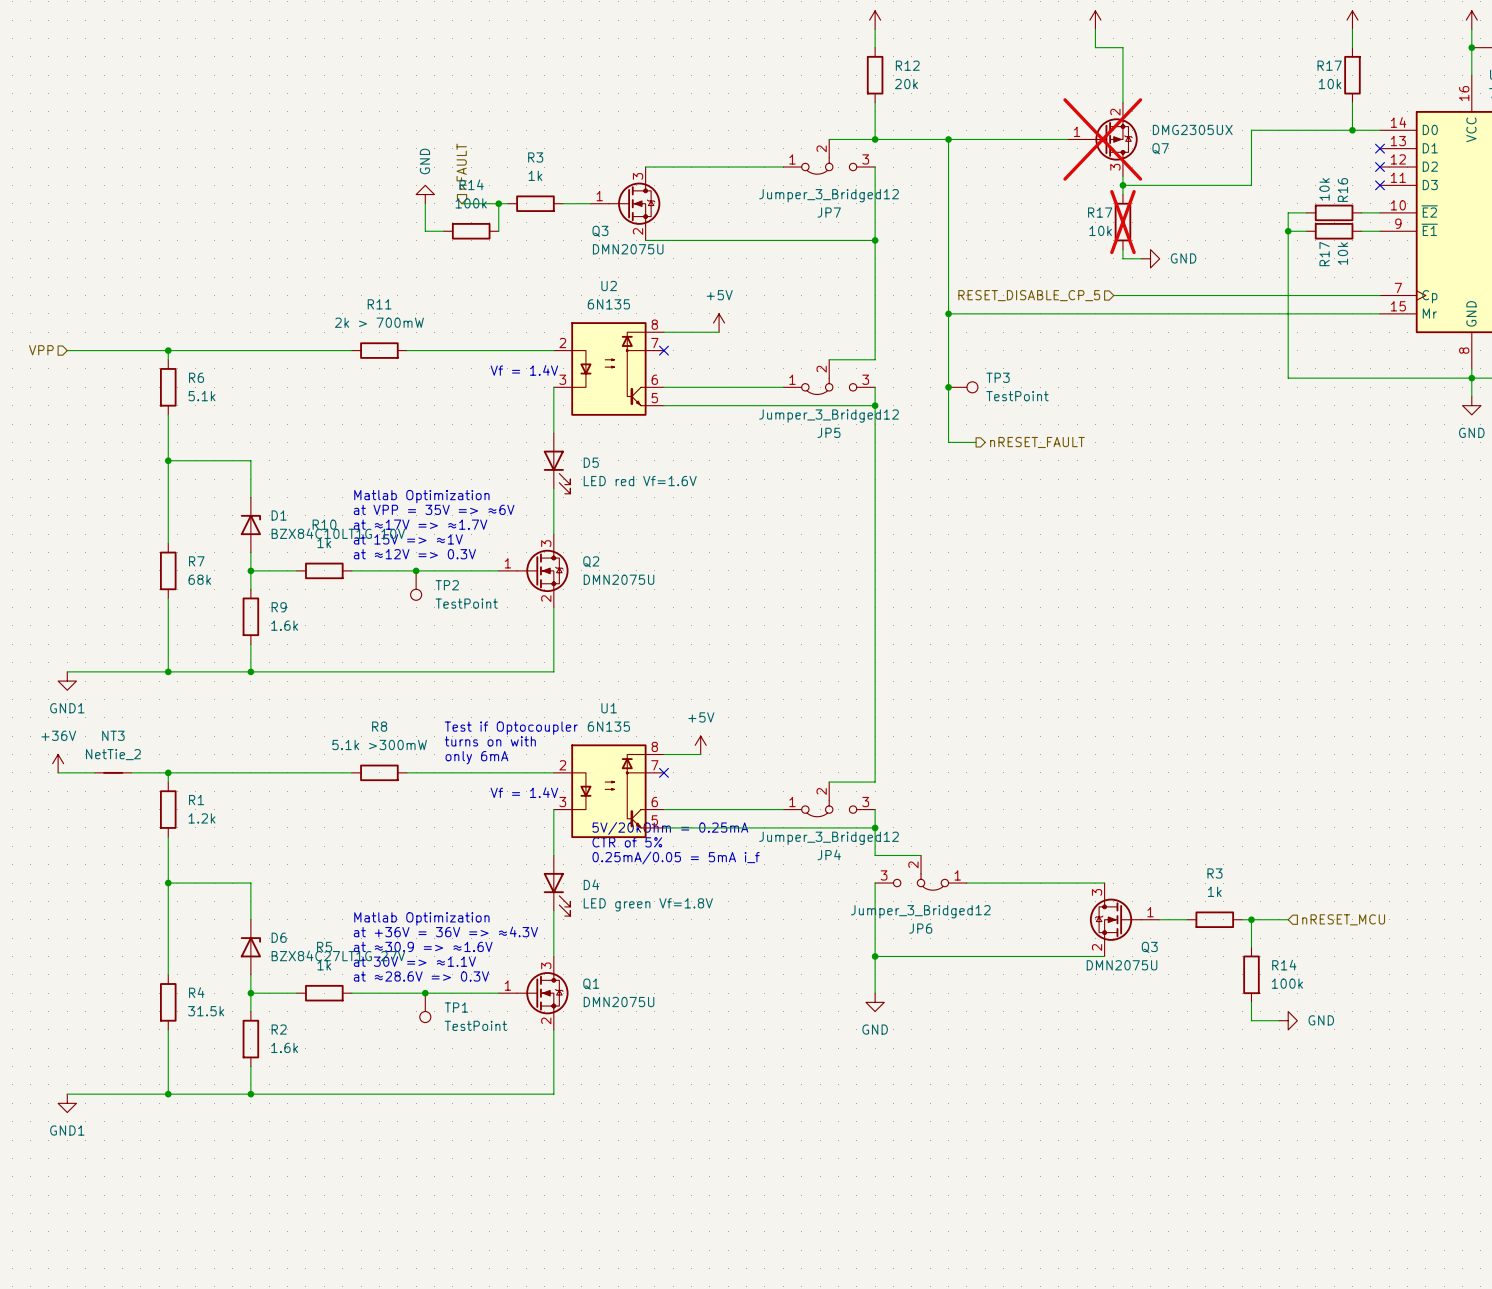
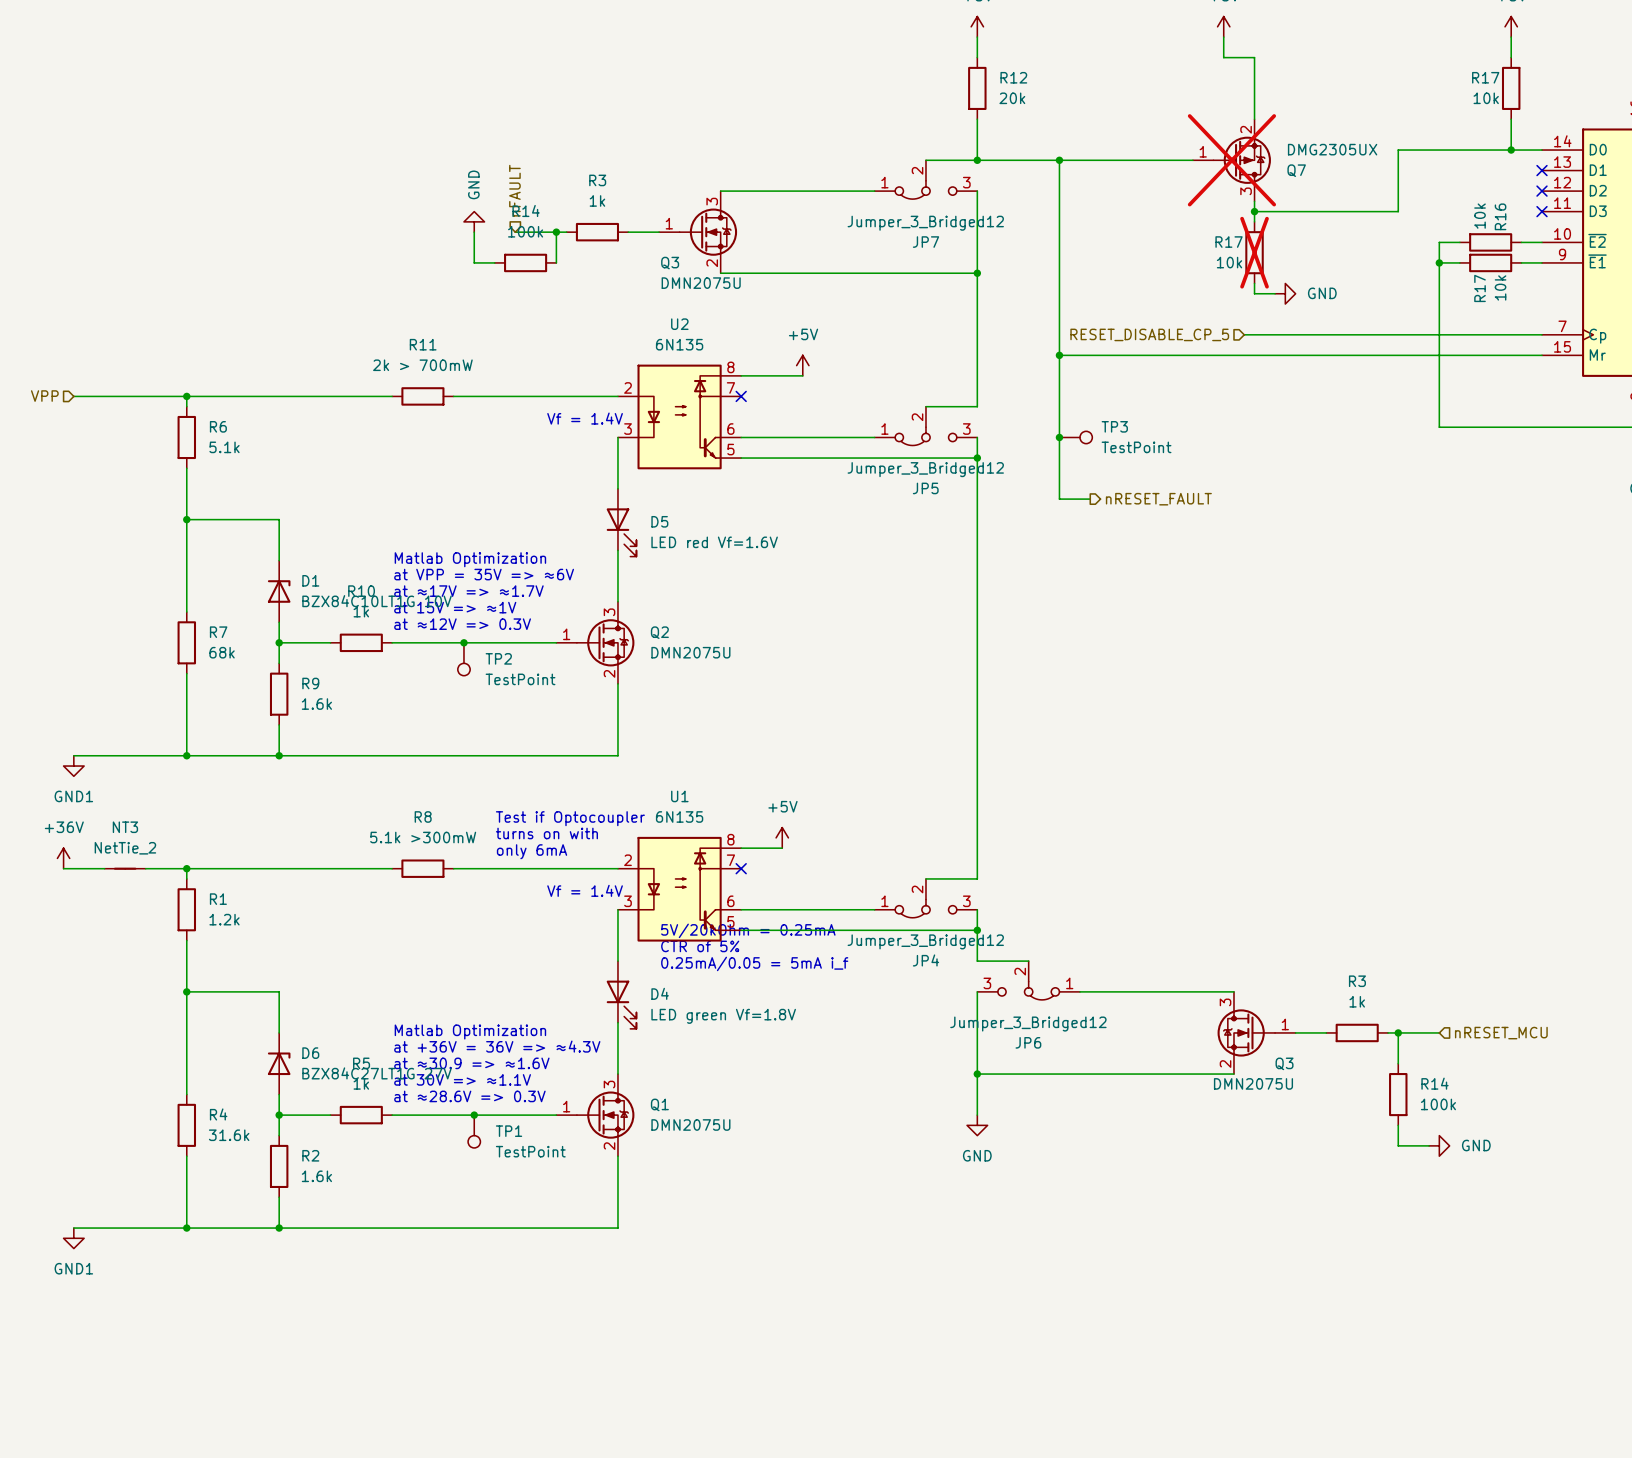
R4 value: 31.5k (206, 1011) -> 31.6k (229, 1135)

